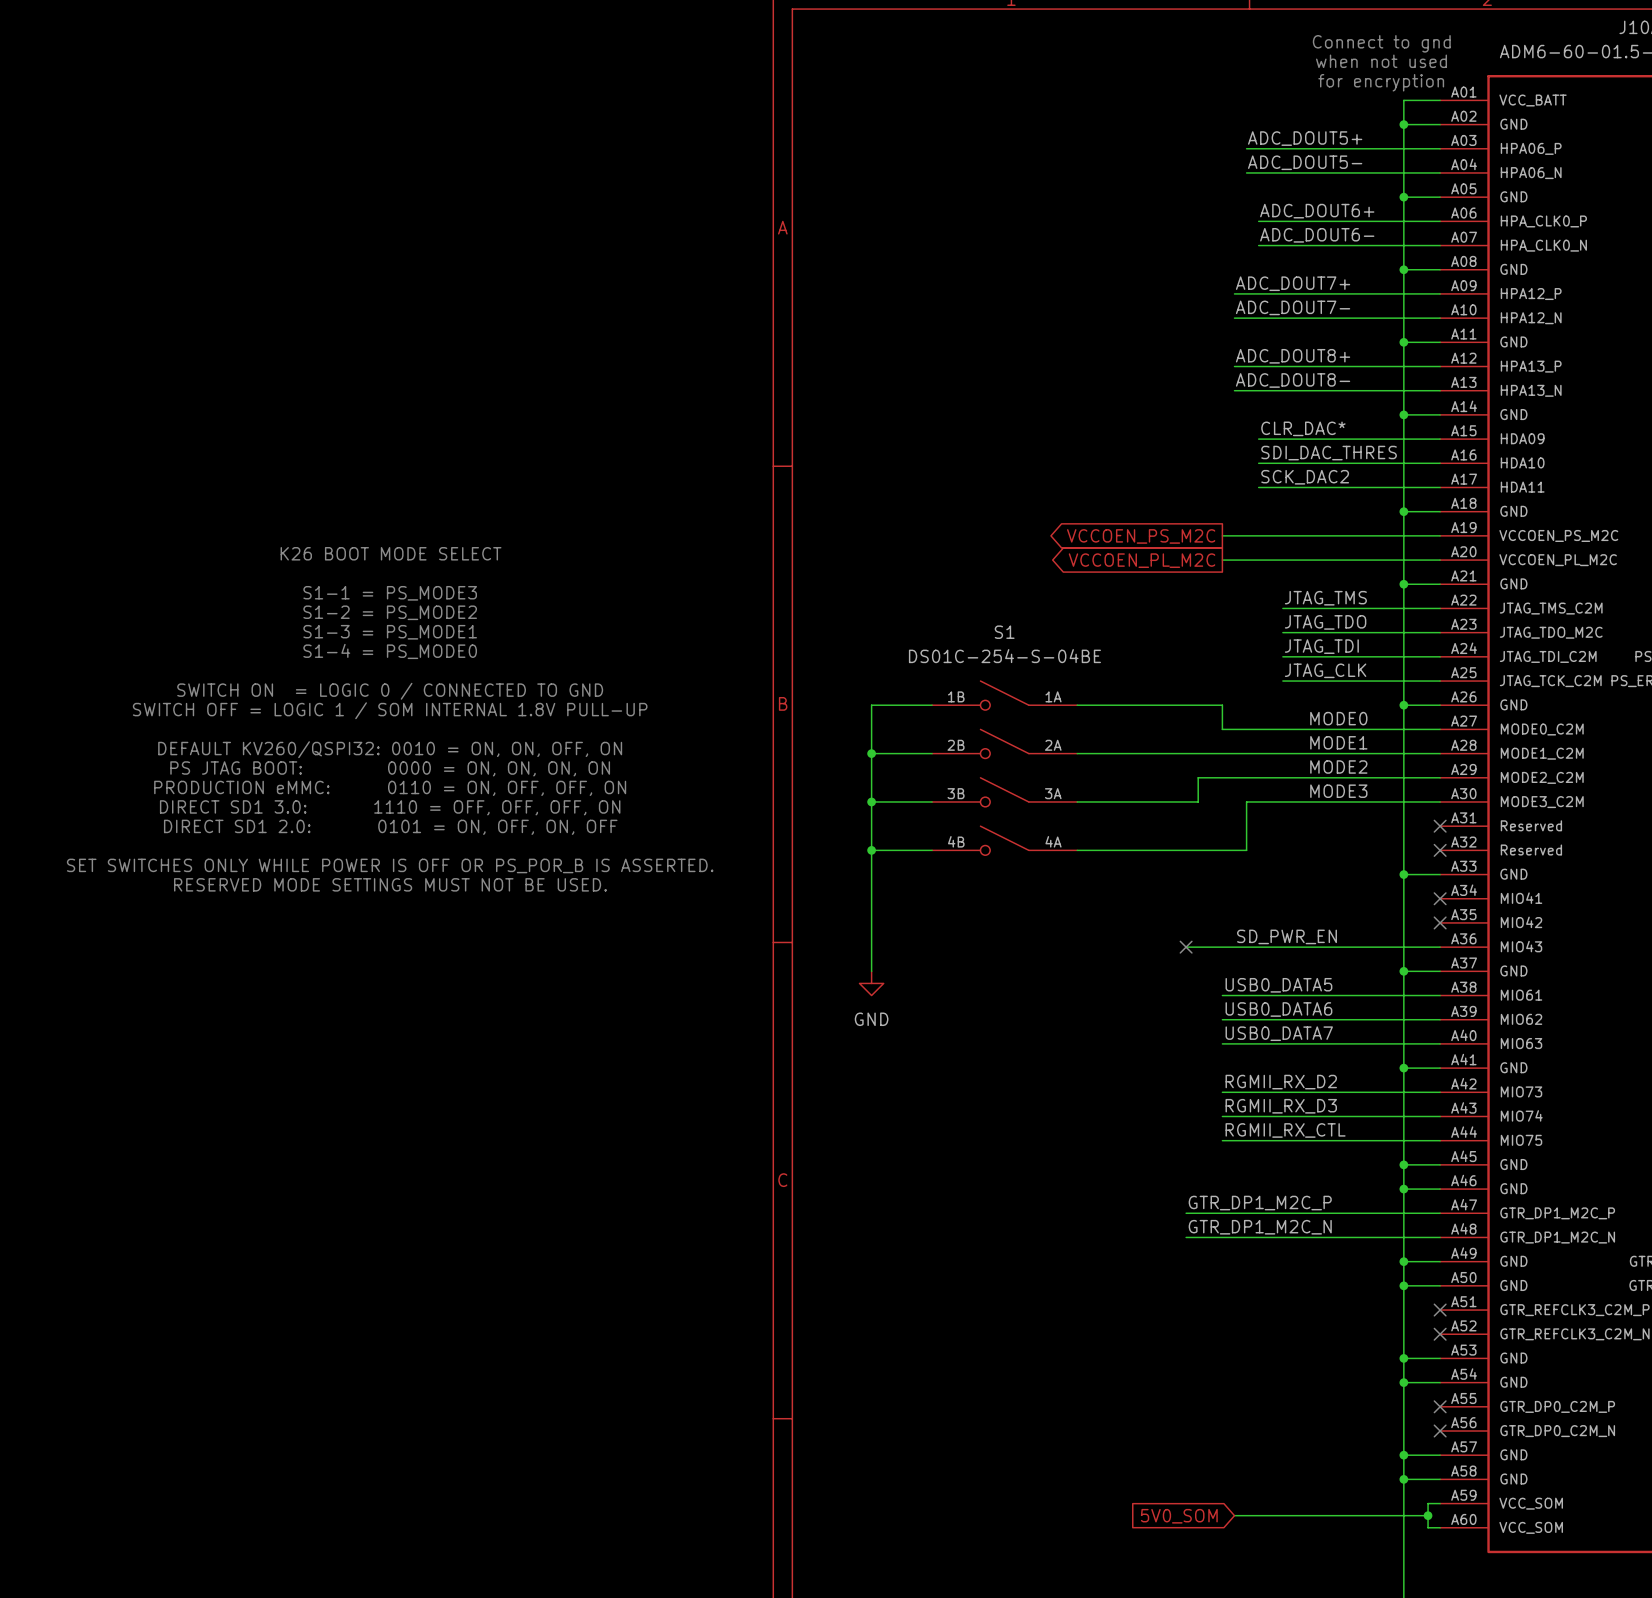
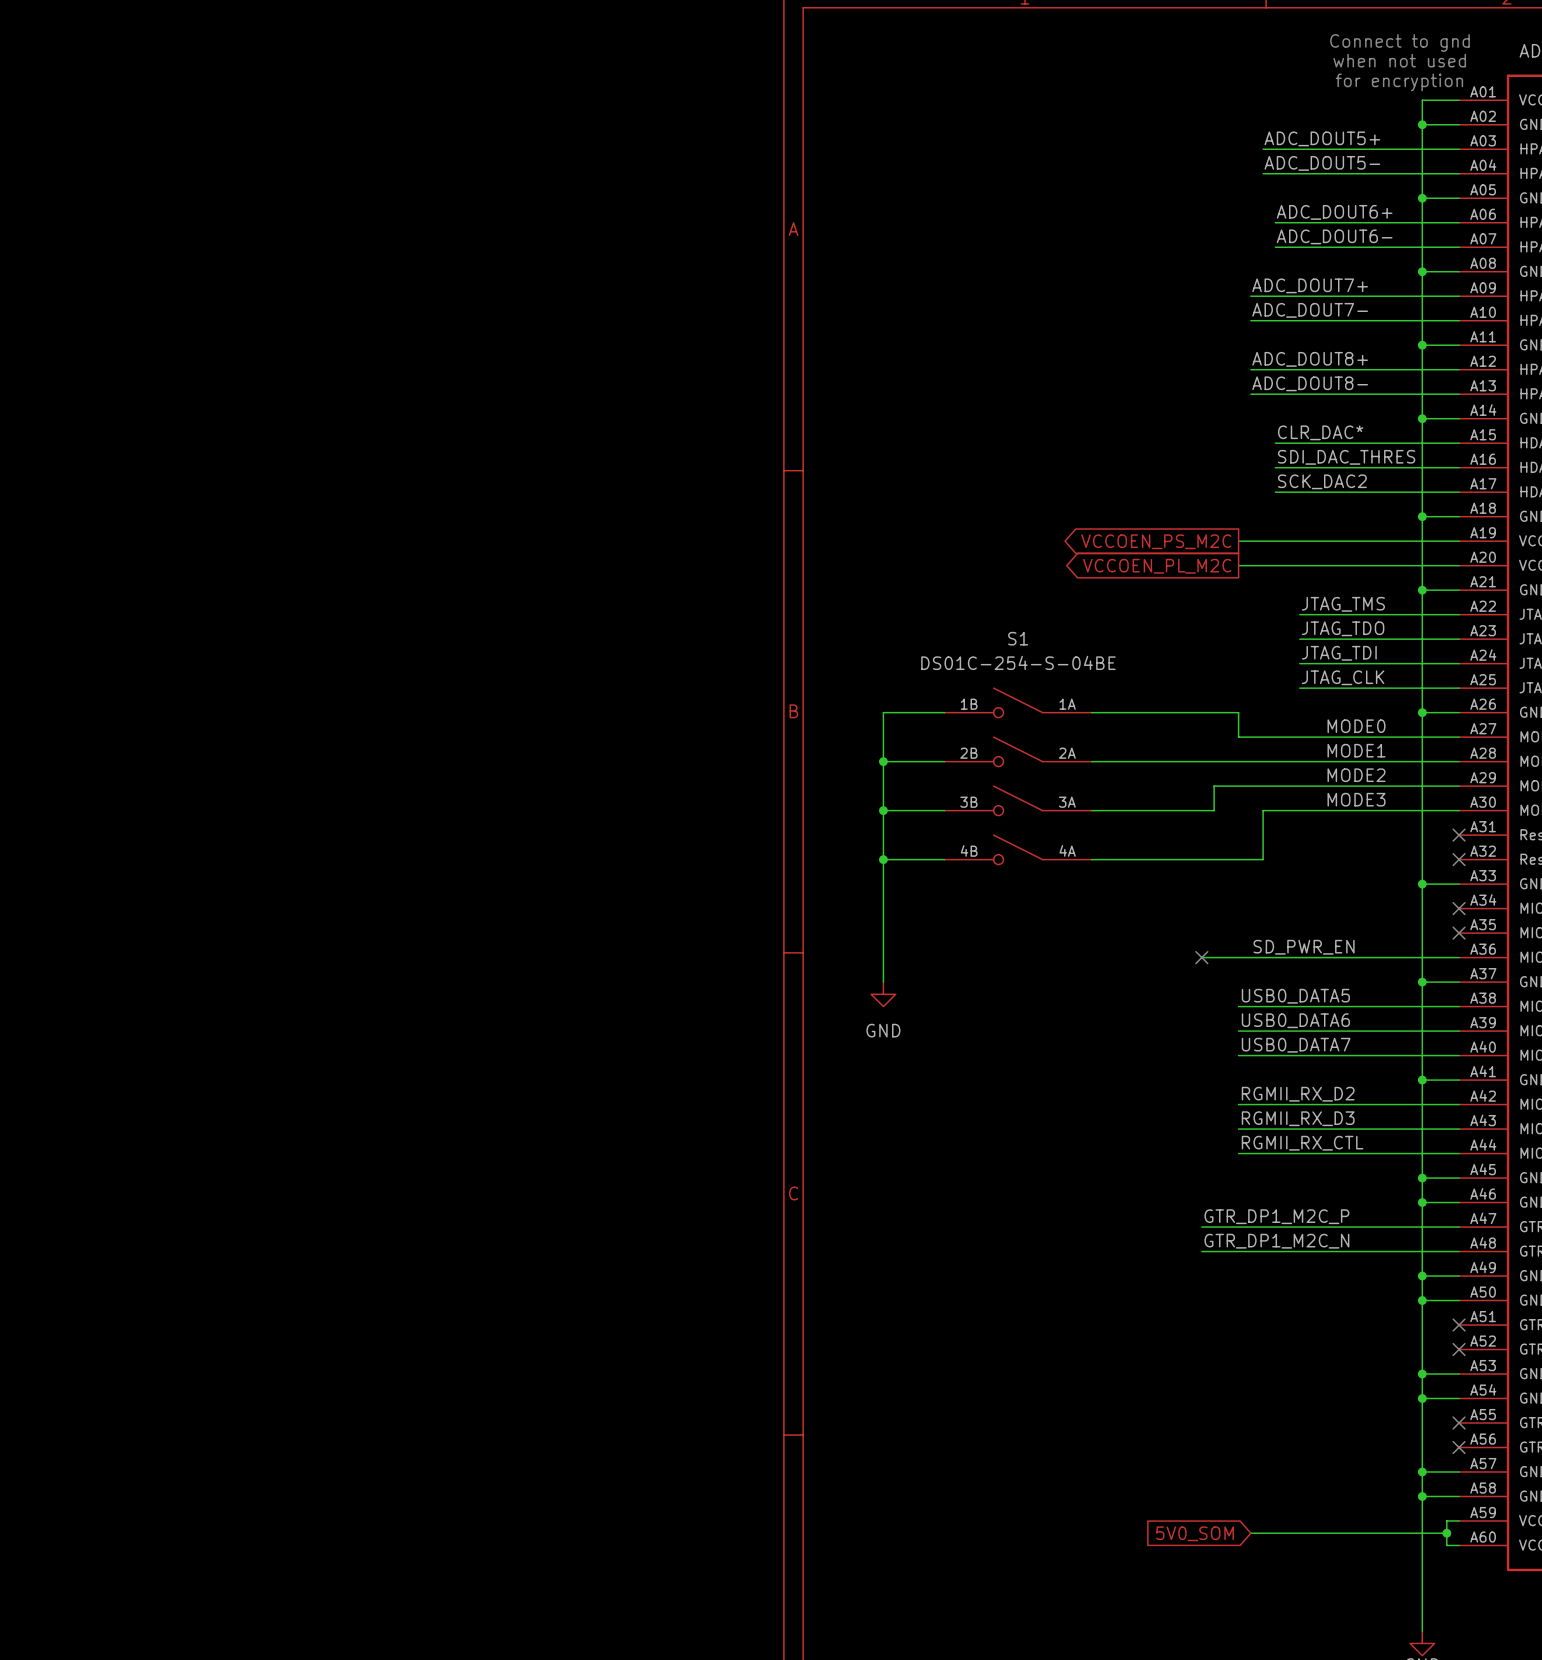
text: K26 BOOT MODE SELECT (391, 553) -> none
text: S1-1 = PS_MODE3 (390, 593) -> none
text: S1-2 = PS_MODE2 (390, 612) -> none
text: S1-3 = PS_MODE1 (390, 632) -> none
text: S1-4 = PS_MODE0 (390, 651) -> none
text: SWITCH ON = LOGIC 0 / CONNECTED TO GND (390, 691) -> none
text: SWITCH OFF = LOGIC 1 / SOM INTERNAL 1.8V PULL-UP (390, 710) -> none
text: DEFAULT KV260/QSPI32: 0010 = ON, ON, OFF, ON (390, 749) -> none
text: PS JTAG BOOT: 0000 = ON, ON, ON, ON (390, 768) -> none
text: PRODUCTION eMMC: 0110 = ON, OFF, OFF, ON (390, 788) -> none
text: DIRECT SD1 3.0: 1110 = OFF, OFF, OFF, ON (390, 807) -> none
text: DIRECT SD1 2.0: 0101 = ON, OFF, ON, OFF (390, 827) -> none
text: SET SWITCHES ONLY WHILE POWER IS OFF OR PS_POR_B IS ASSERTED. (390, 865) -> none
text: RESERVED MODE SETTINGS MUST NOT BE USED. (390, 884) -> none

